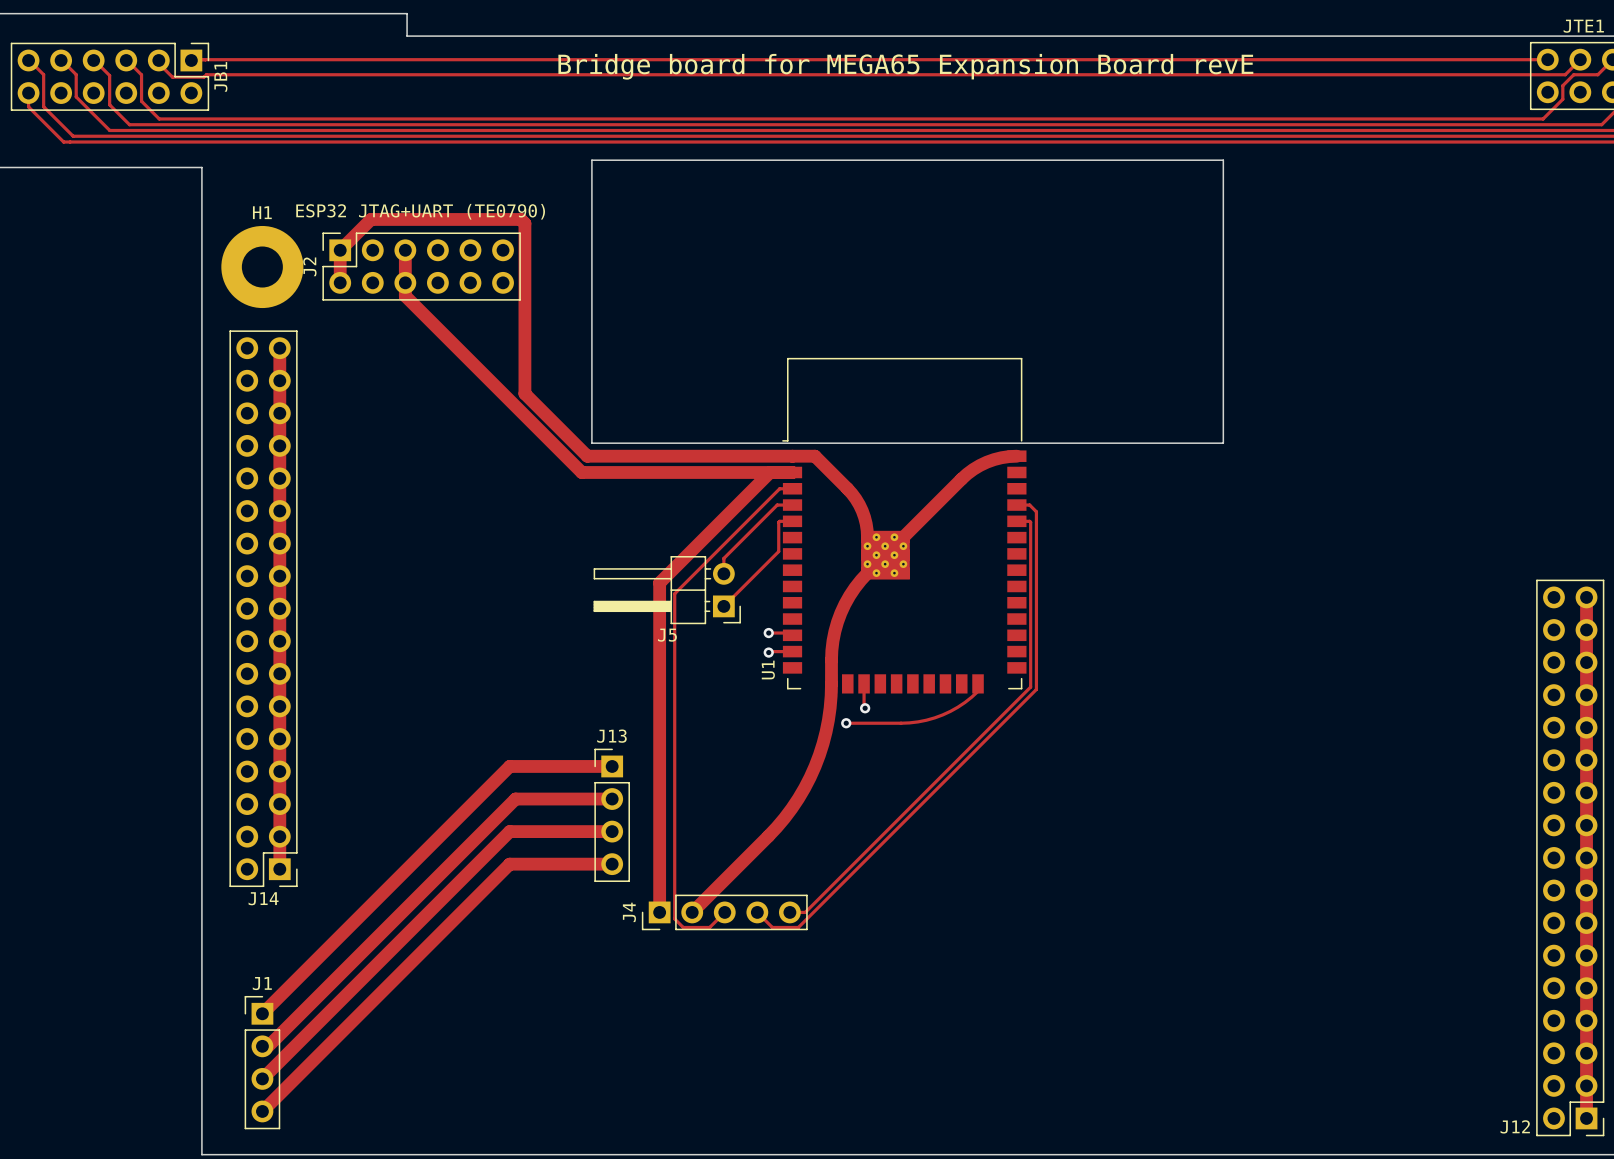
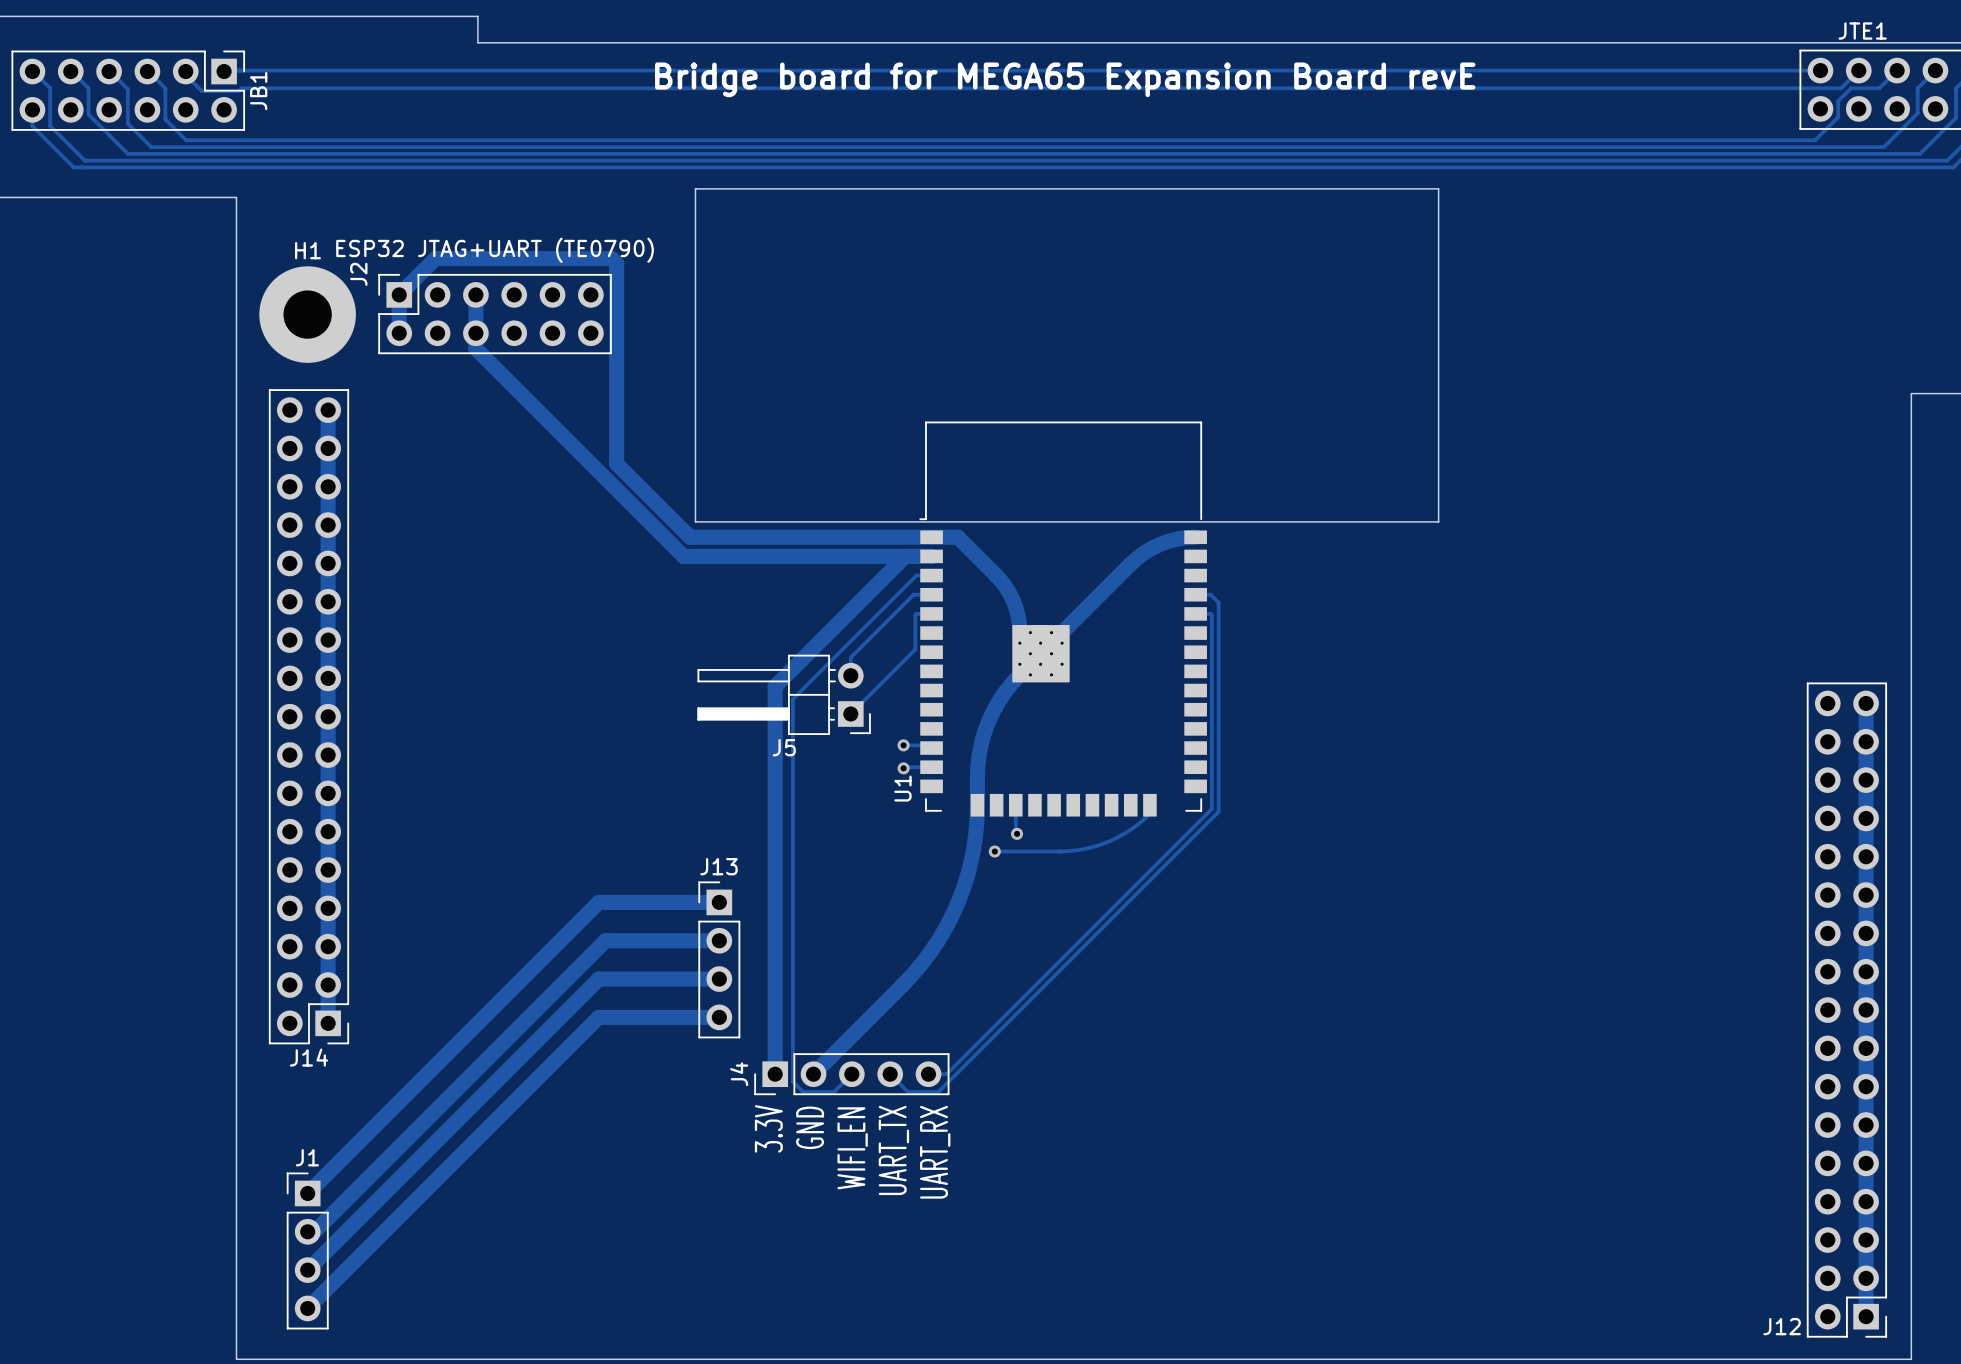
J2 name position: J2 (309, 266) -> J2 (358, 274)
text: none -> GND (810, 1127)
text: none -> 3.3V (768, 1128)
text: none -> UART_TX (893, 1150)
text: none -> UART_RX (935, 1152)
text: none -> WIFI_EN (852, 1148)

